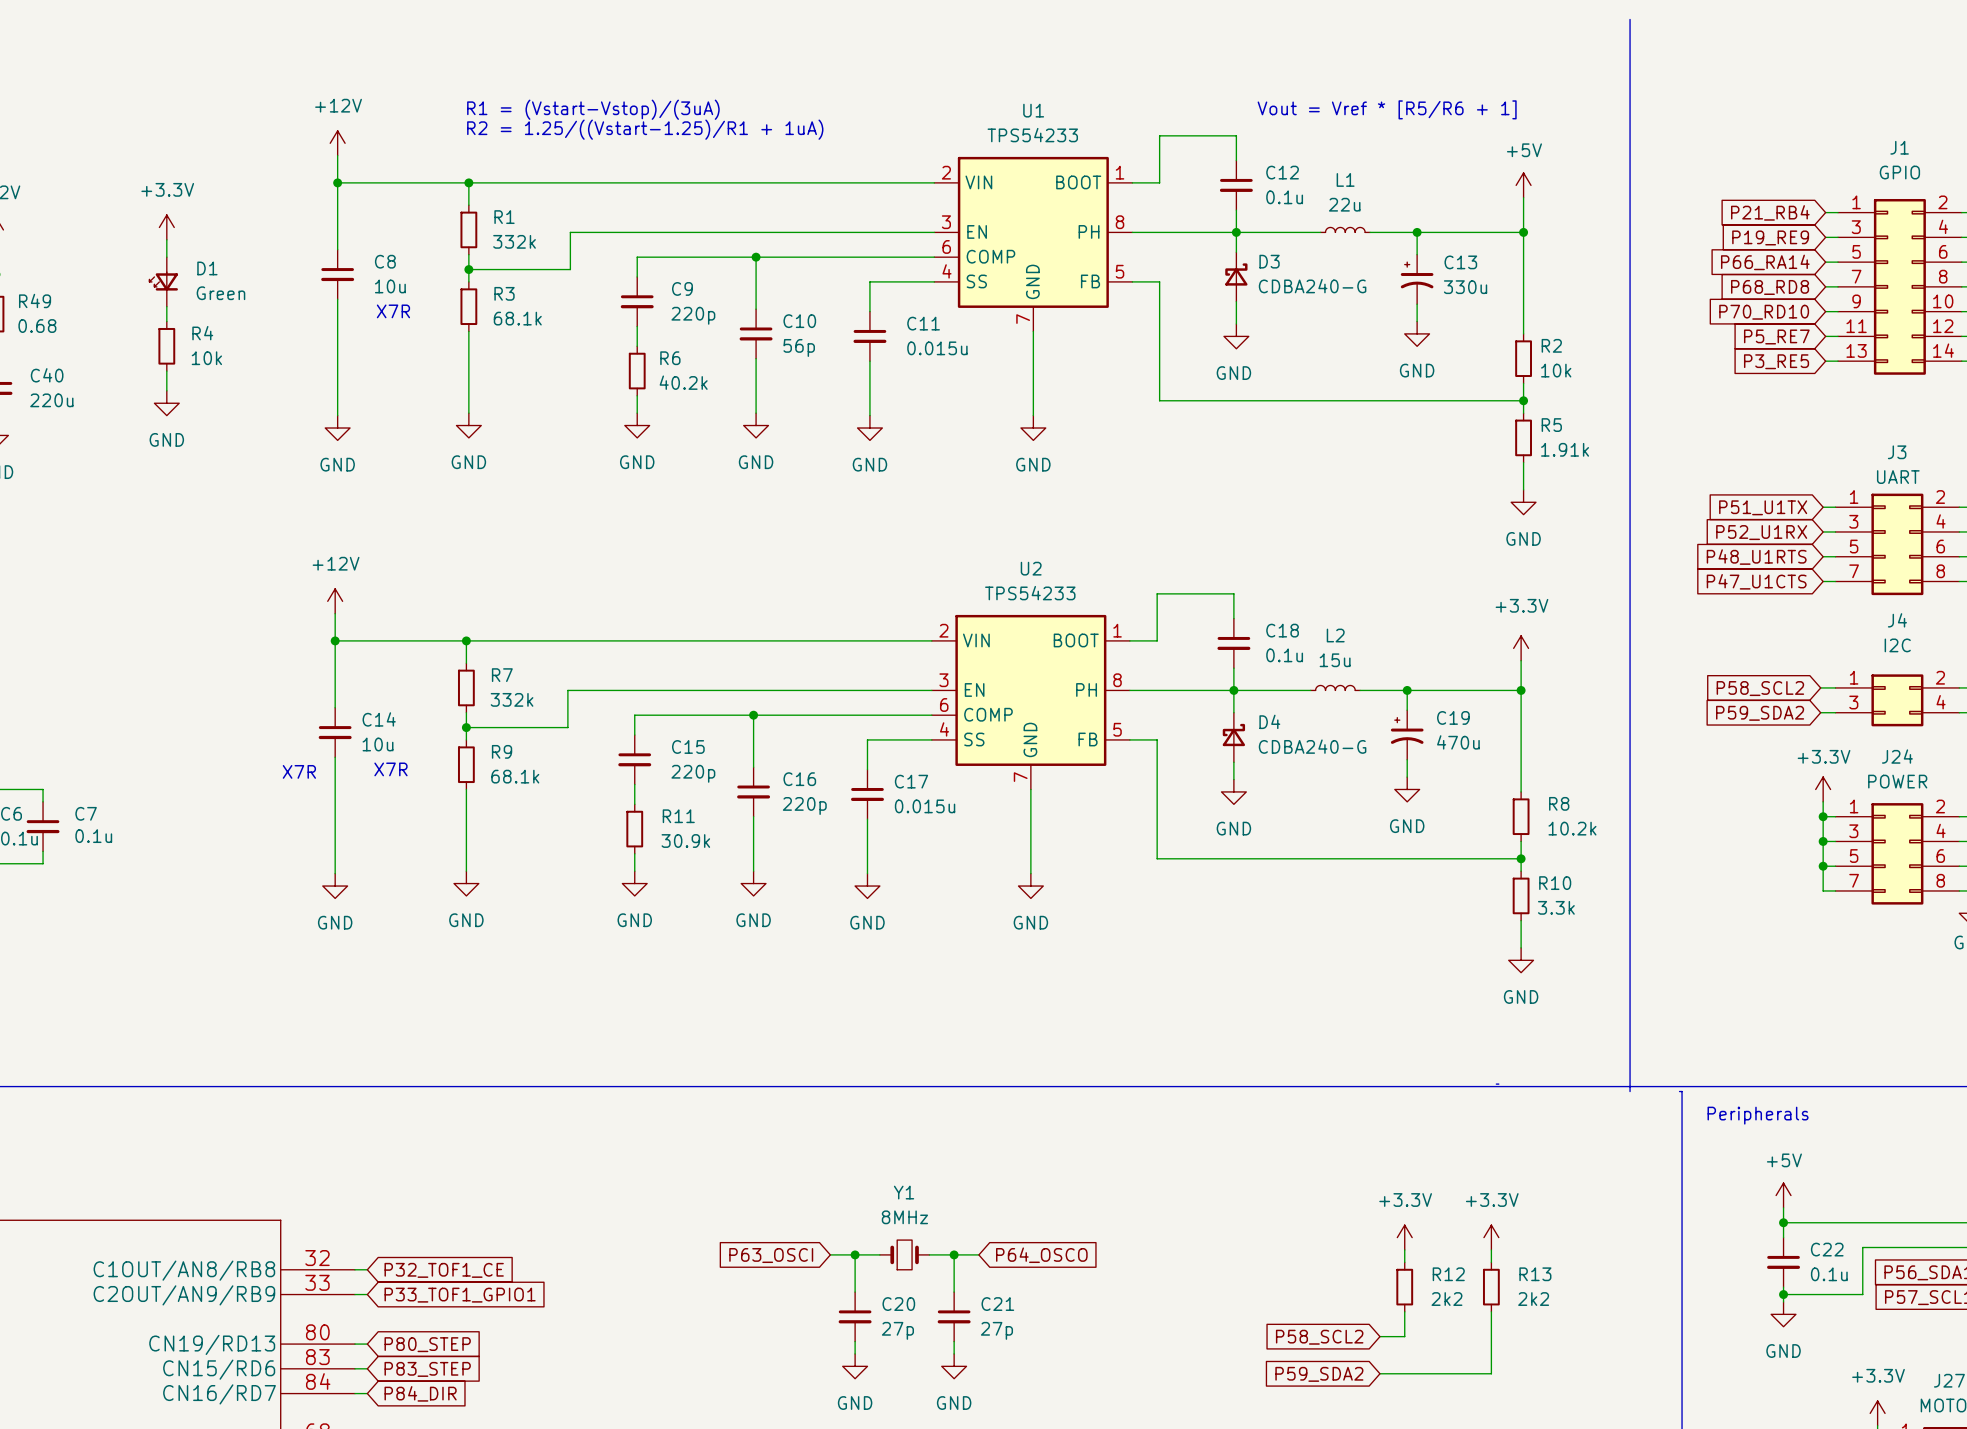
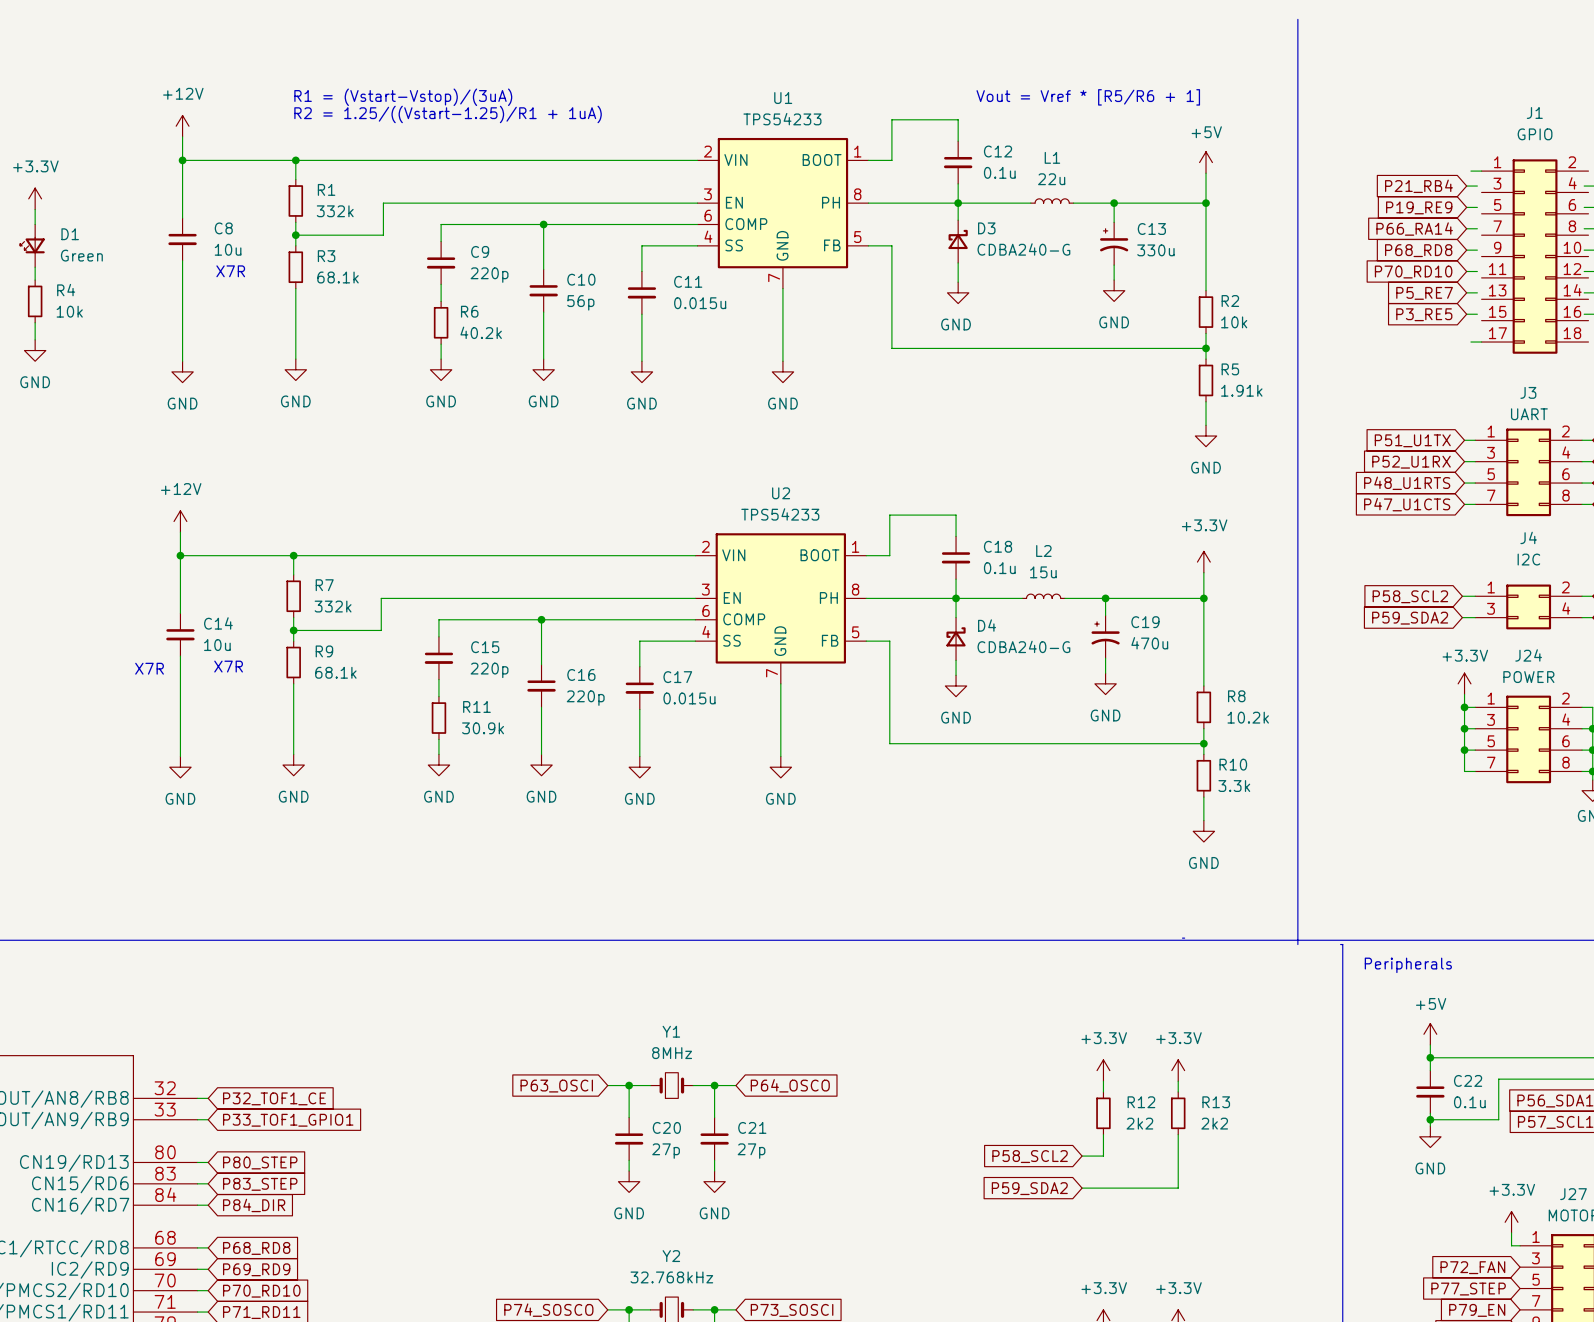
J1 name position: J1 (1899, 147) -> J1 (1534, 112)
J1 value position: GPIO (1899, 172) -> GPIO (1535, 134)
wire: none -> (1470, 171) (1481, 171)
J1 symbol: [1838, 198, 1962, 375] -> [1481, 159, 1589, 354]
wire: none -> (1470, 342) (1481, 342)

